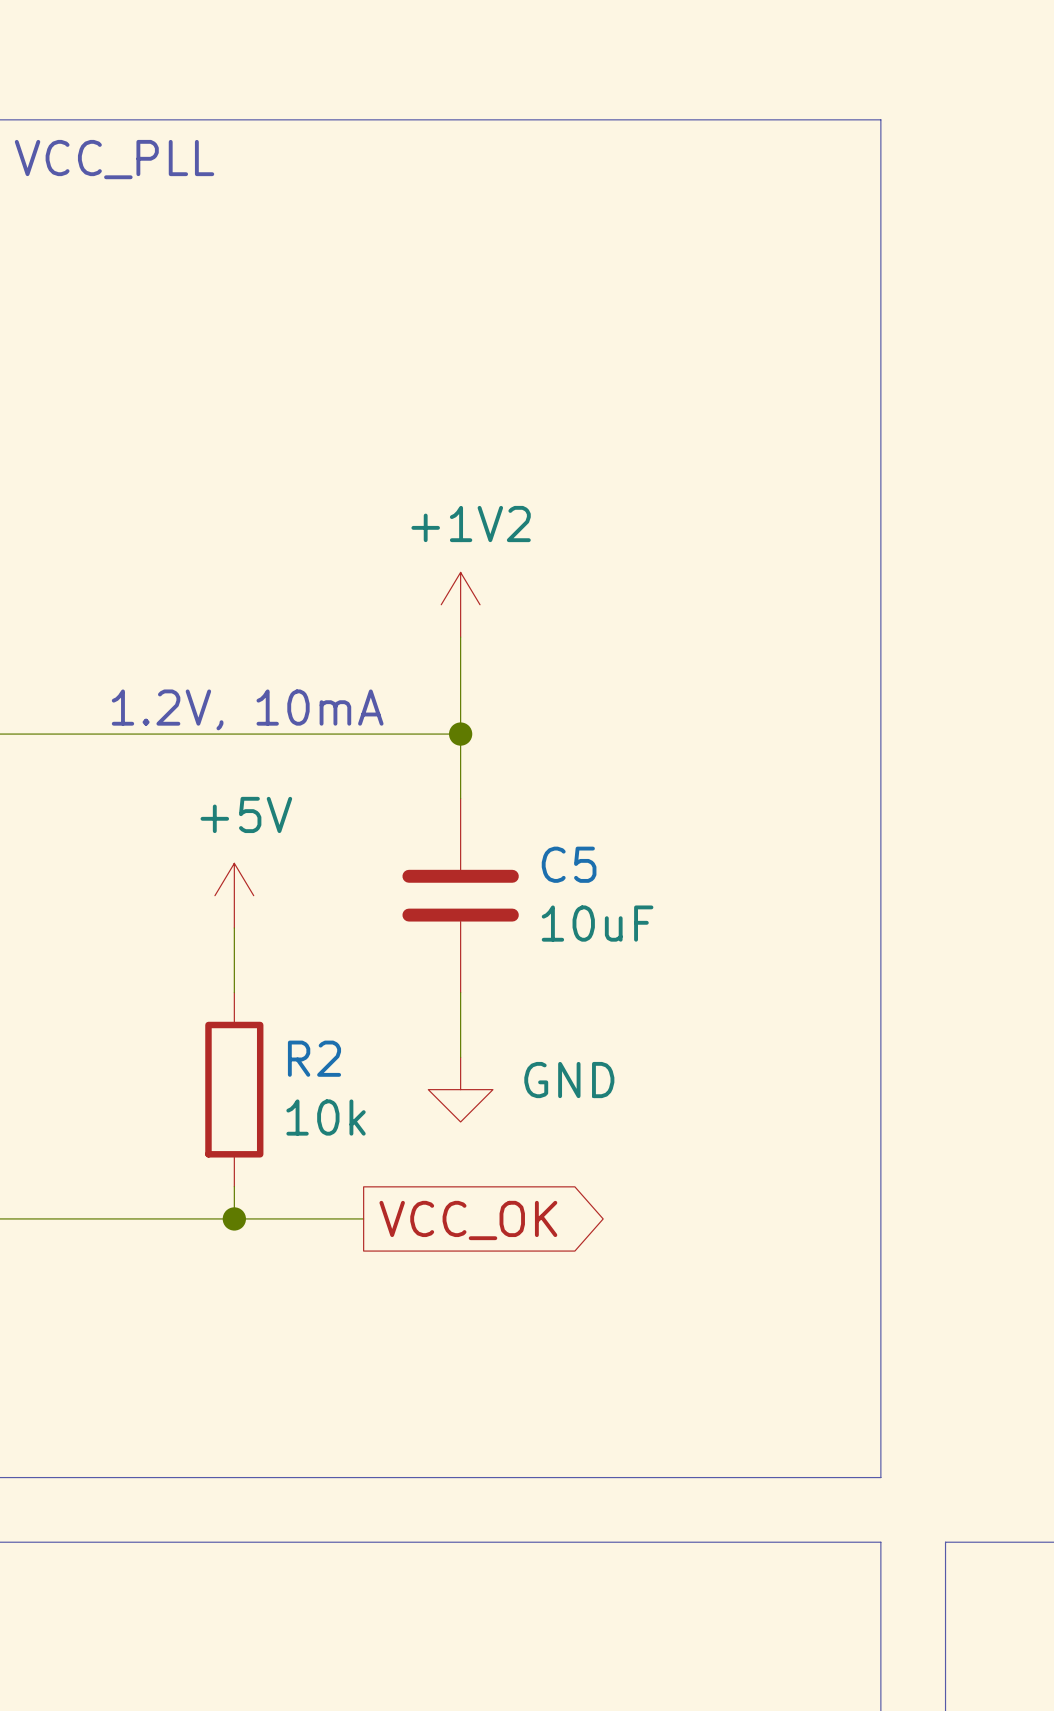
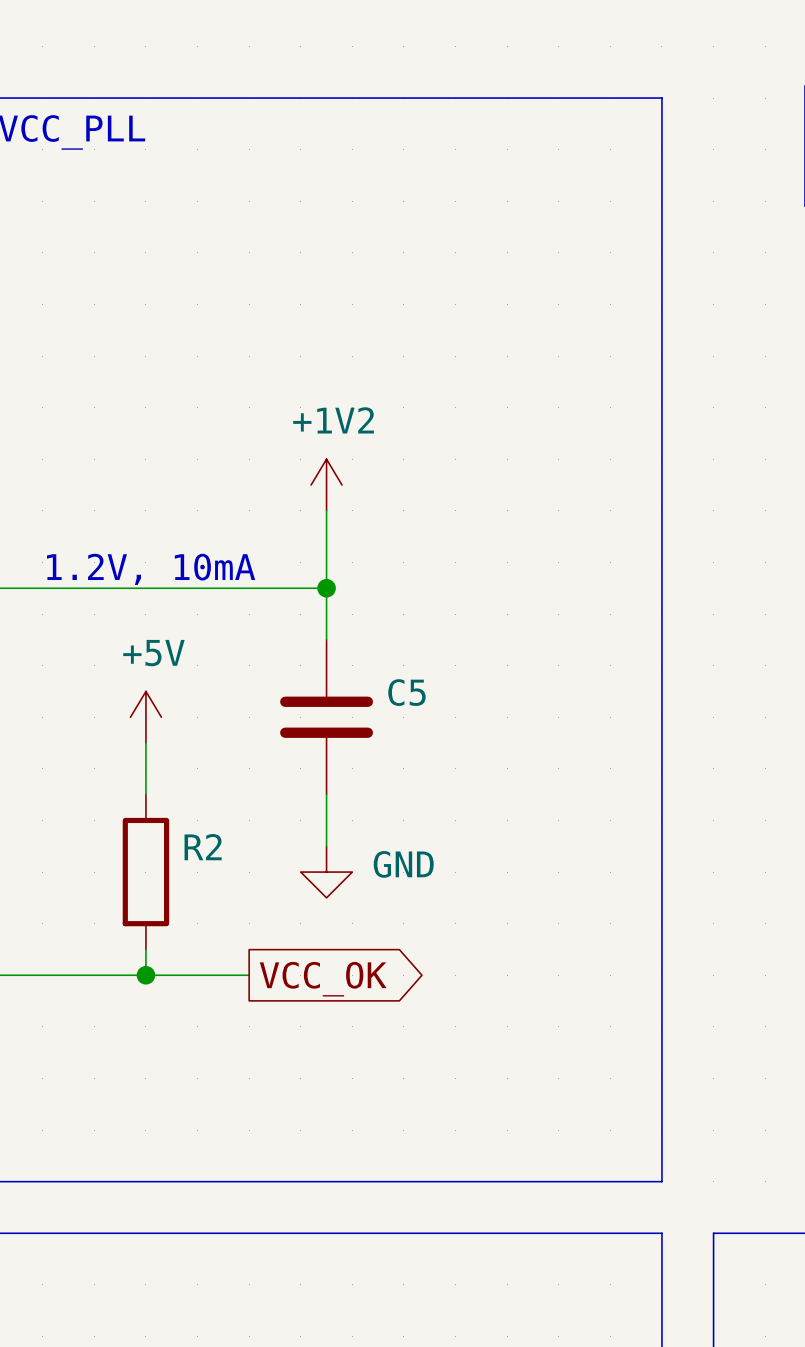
C5 value: 10uF (597, 923) -> none
R2 value: 10k (326, 1117) -> none

